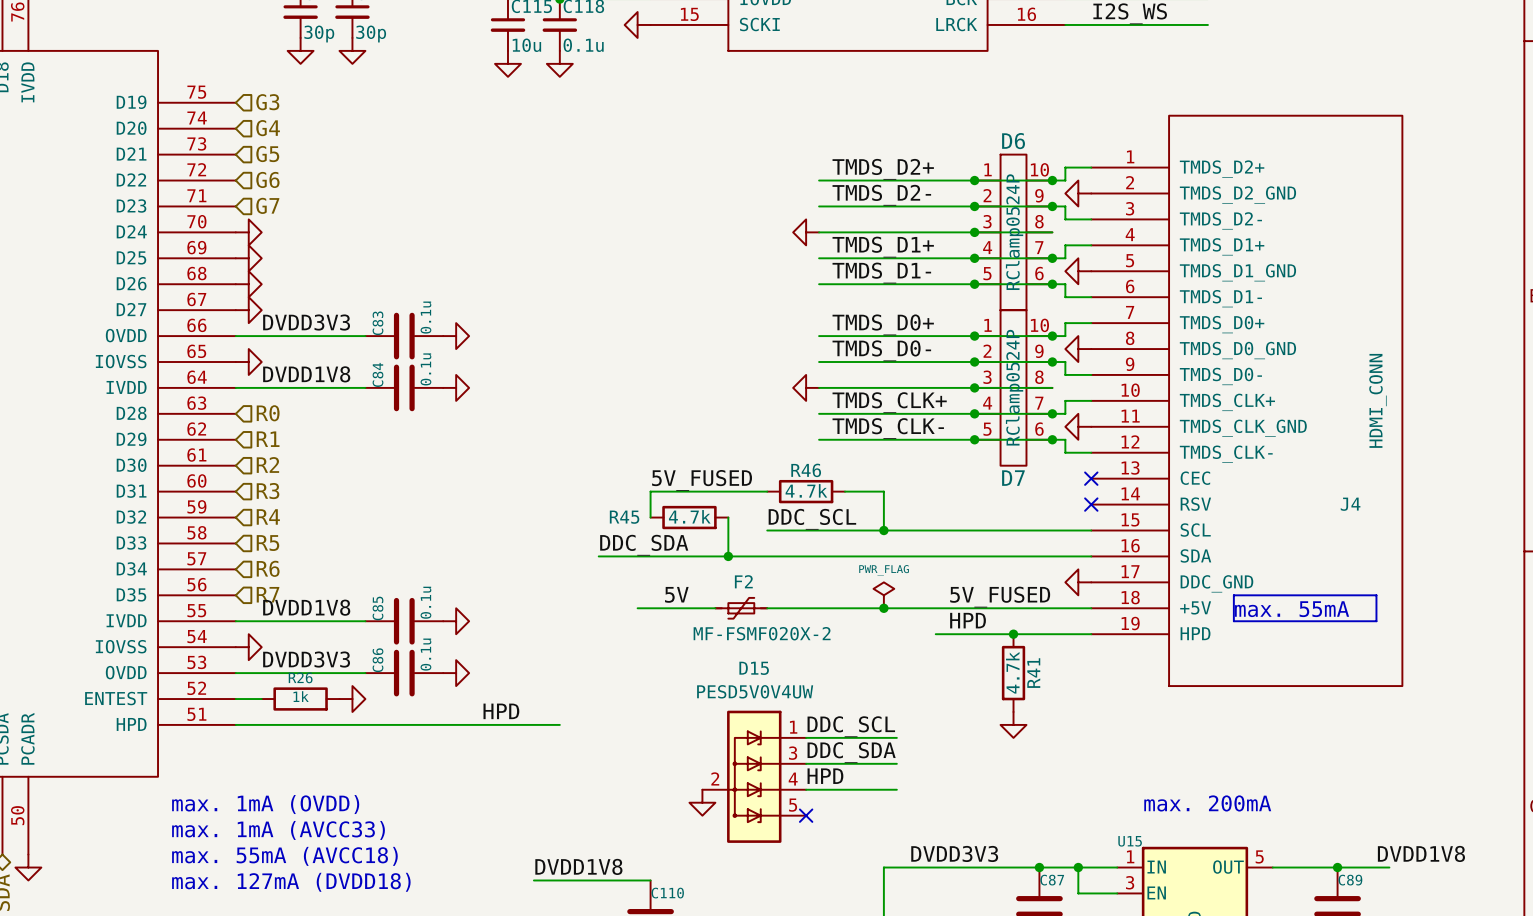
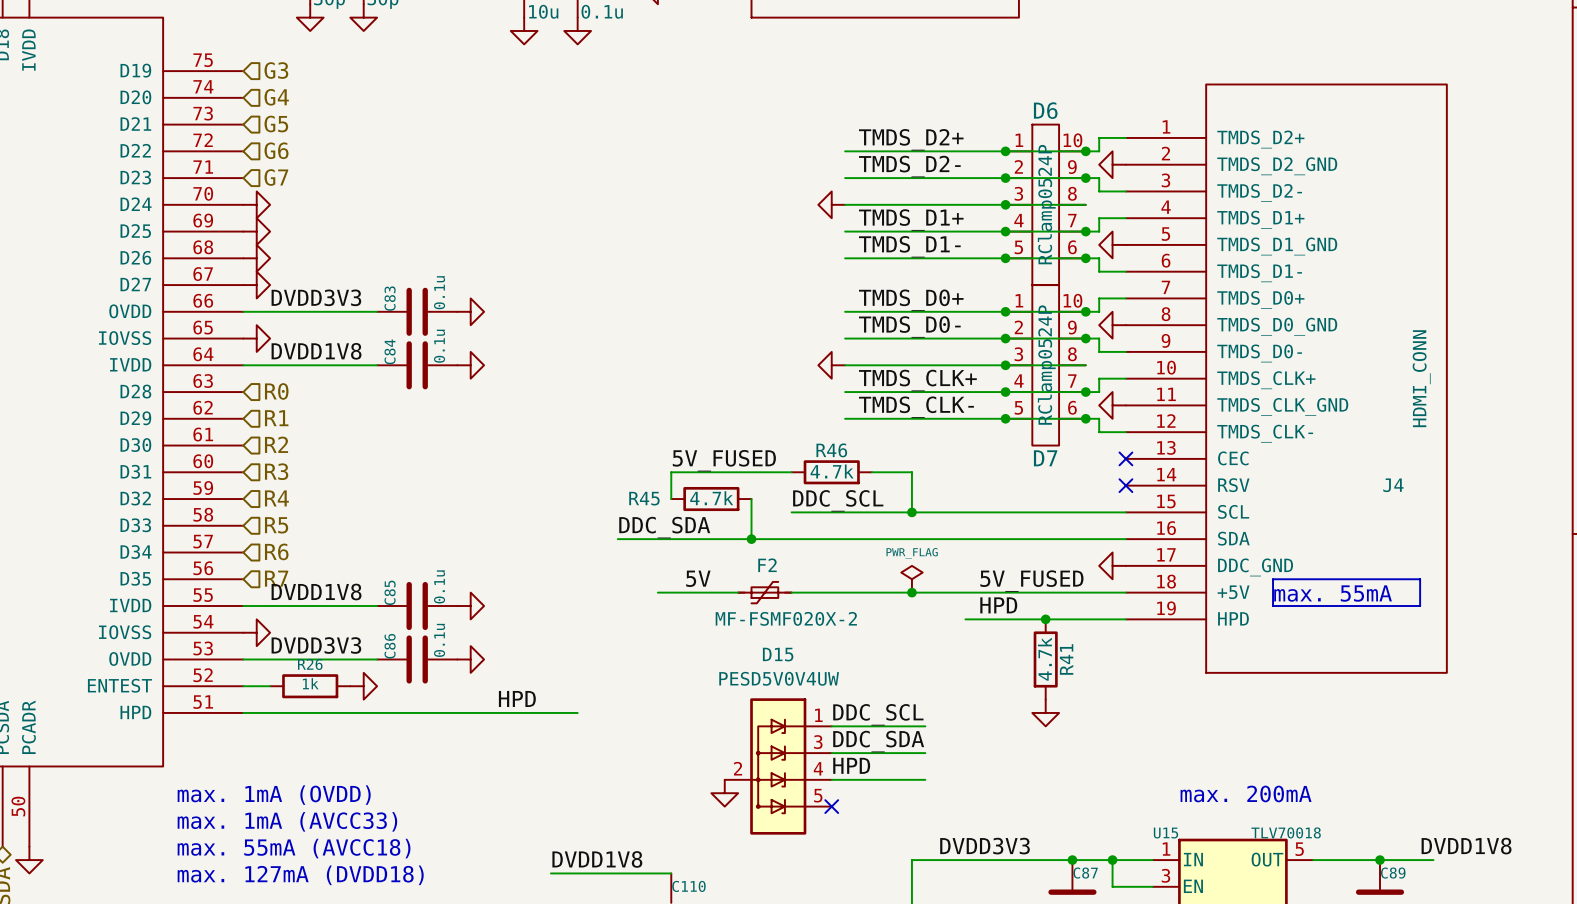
U15 value: none -> TLV70018 (1286, 832)

